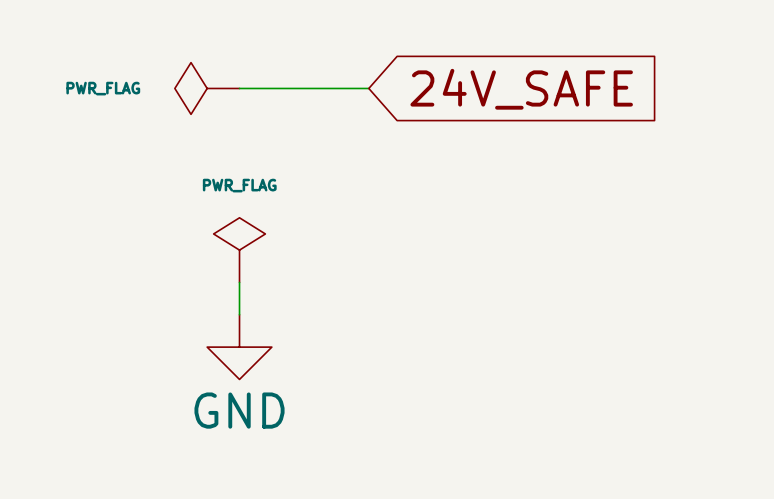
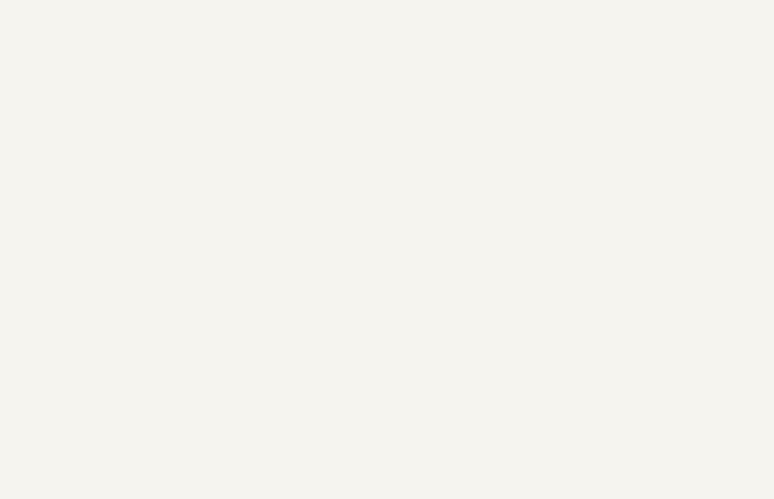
power symbol: PWR_FLAG (207, 88) -> none
wire: (239, 88) (368, 88) -> none
global label: 24V_SAFE (521, 89) -> none
power symbol: PWR_FLAG (239, 250) -> none
wire: (239, 282) (239, 314) -> none
power symbol: GND (239, 347) -> none

